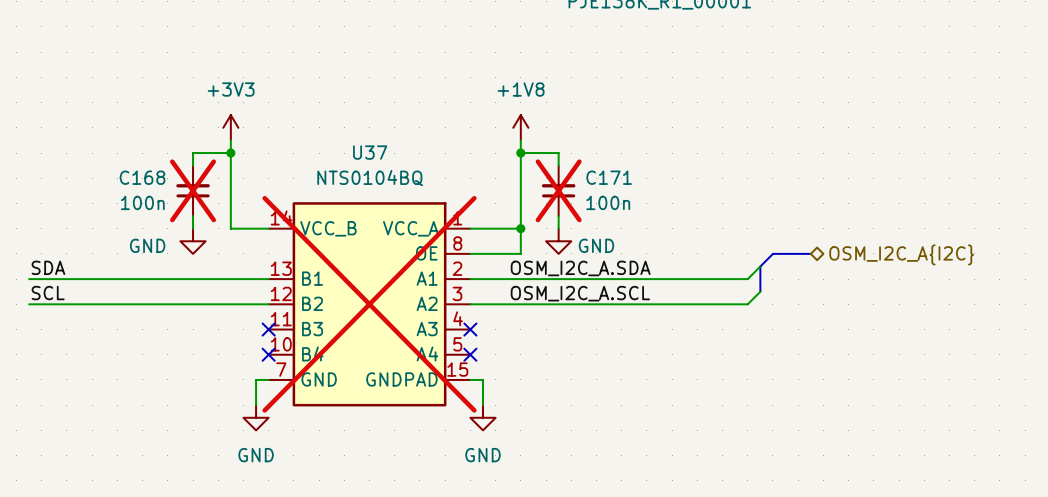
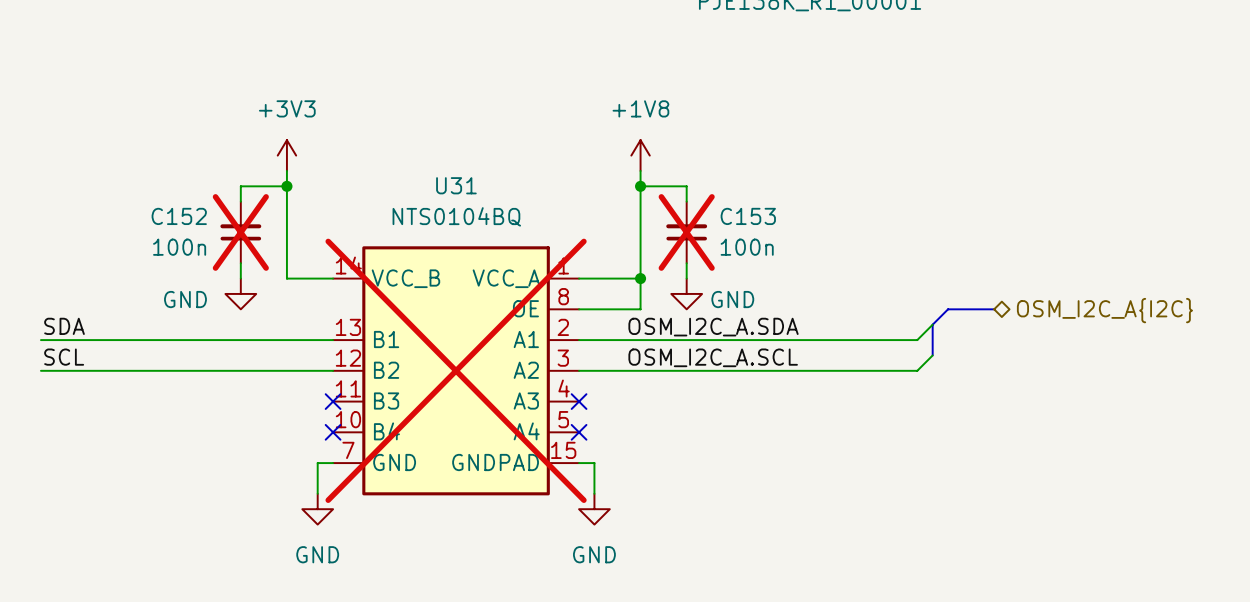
U37 name: U37 (370, 152) -> U31 (456, 185)
C168 name: C168 (142, 177) -> C152 (179, 216)
C171 name: C171 (609, 177) -> C153 (748, 216)

